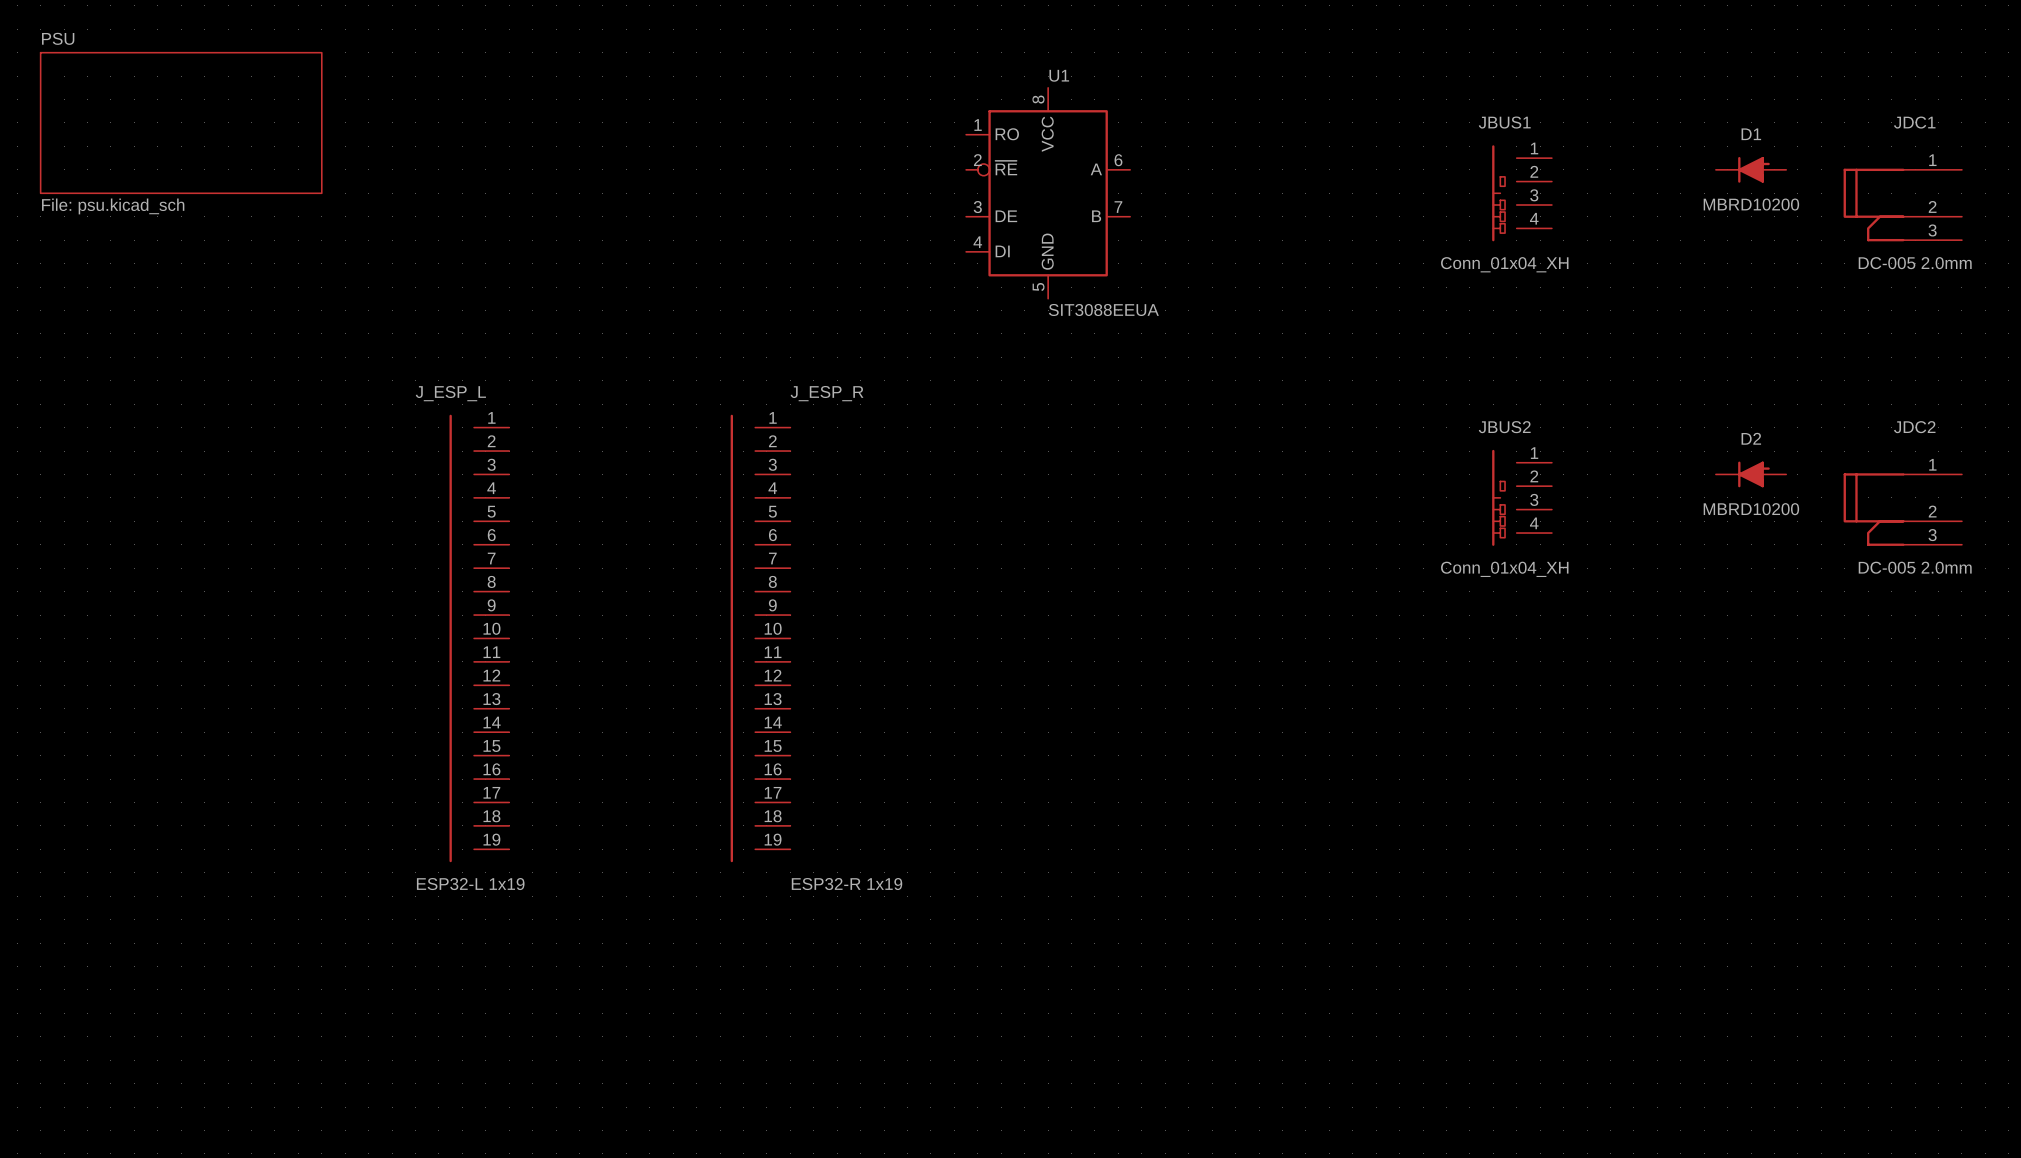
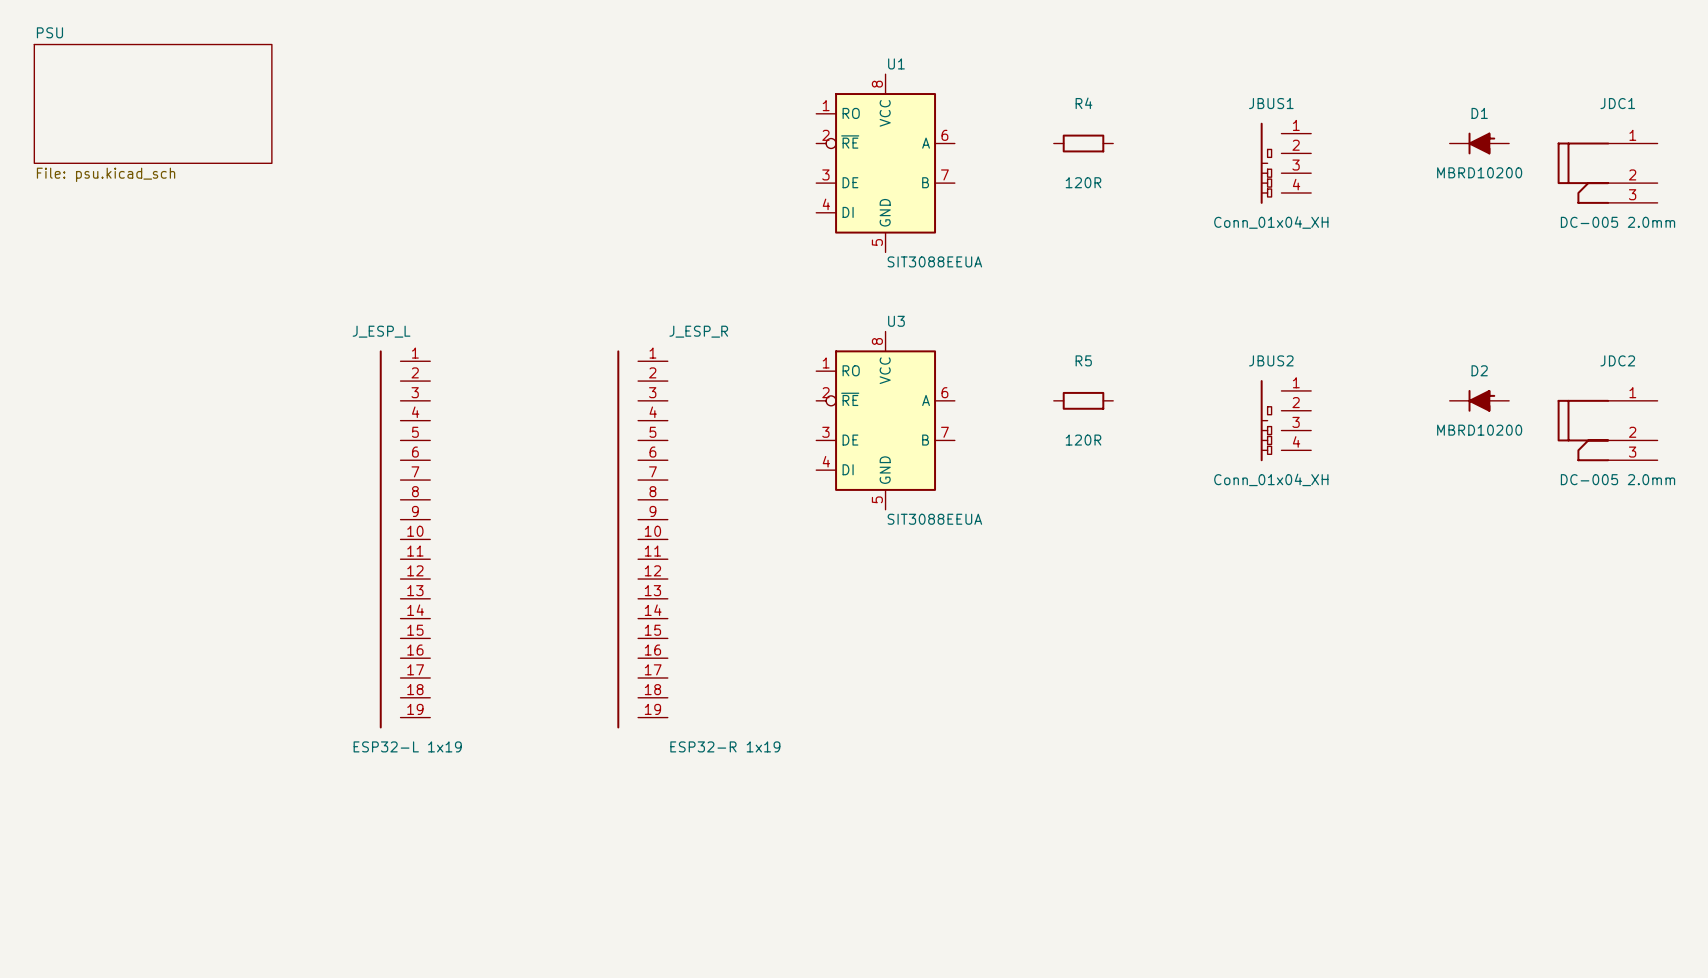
R4: none -> 120R (1083, 143)
R5: none -> 120R (1083, 400)
U3: none -> SIT3088EEUA (885, 420)

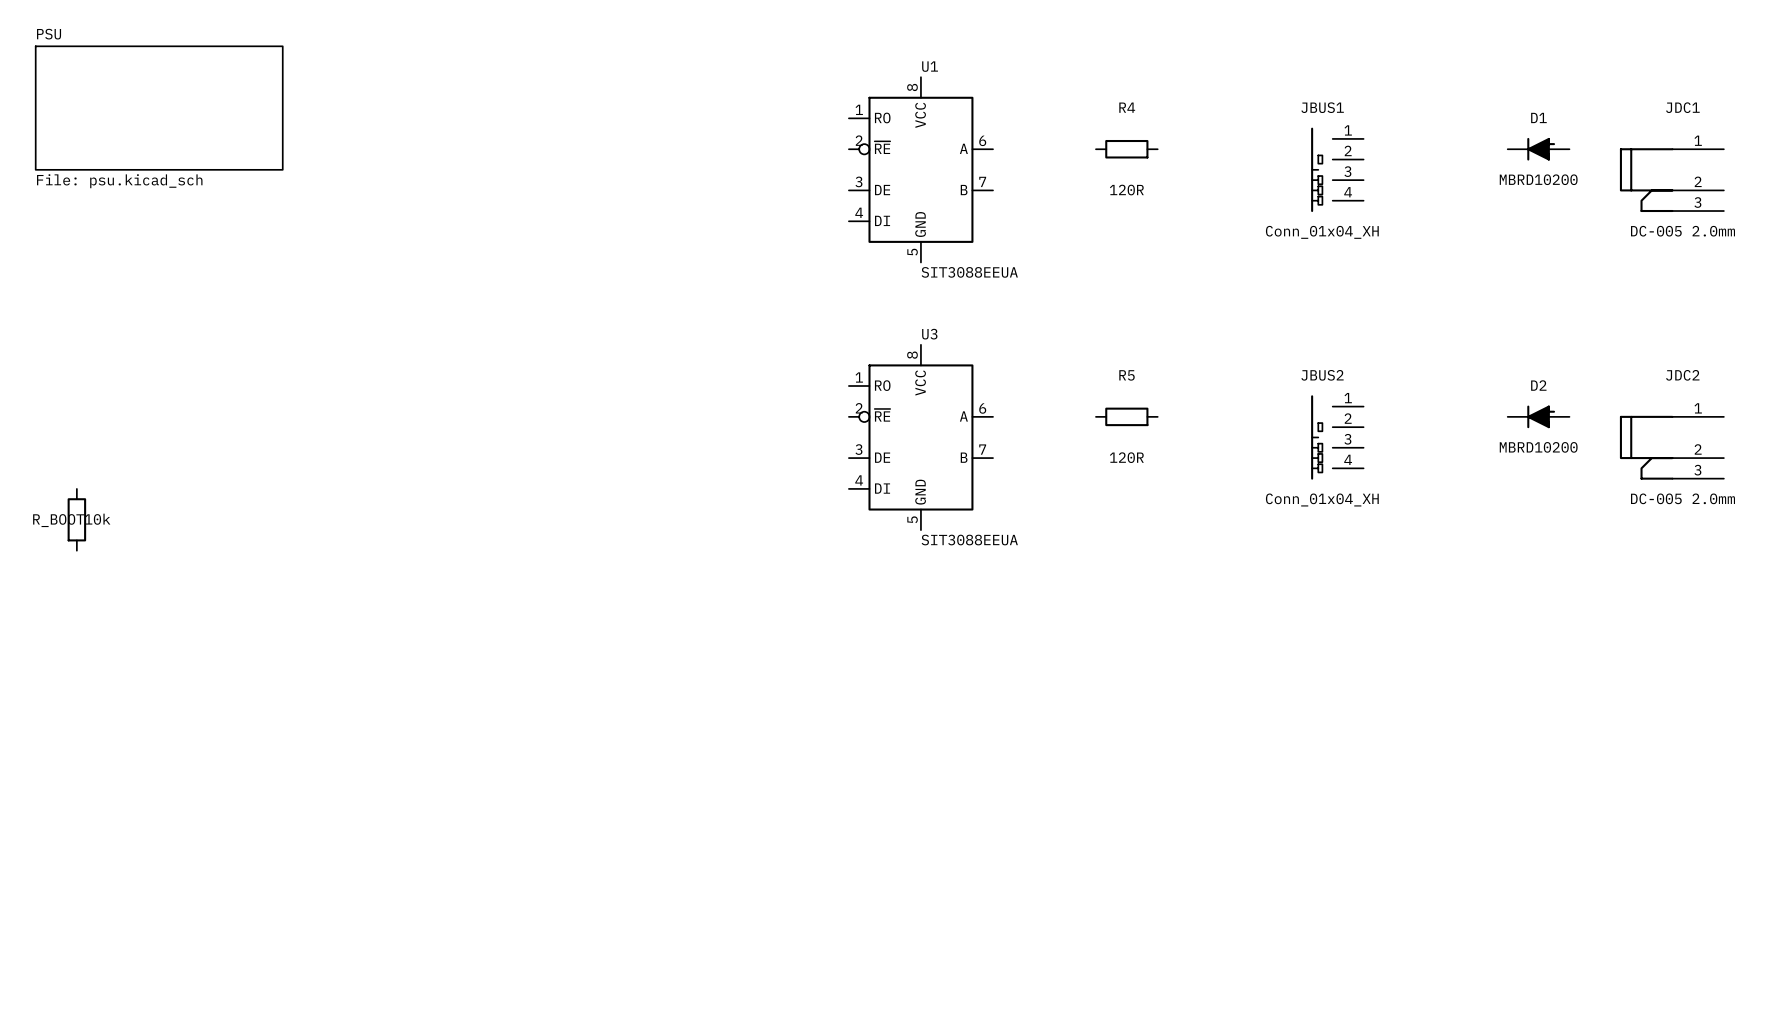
R_BOOT: none -> 10k (76, 519)
J_ESP_L: ESP32-L 1x19 (405, 539) -> none
J_ESP_R: ESP32-R 1x19 (642, 539) -> none

